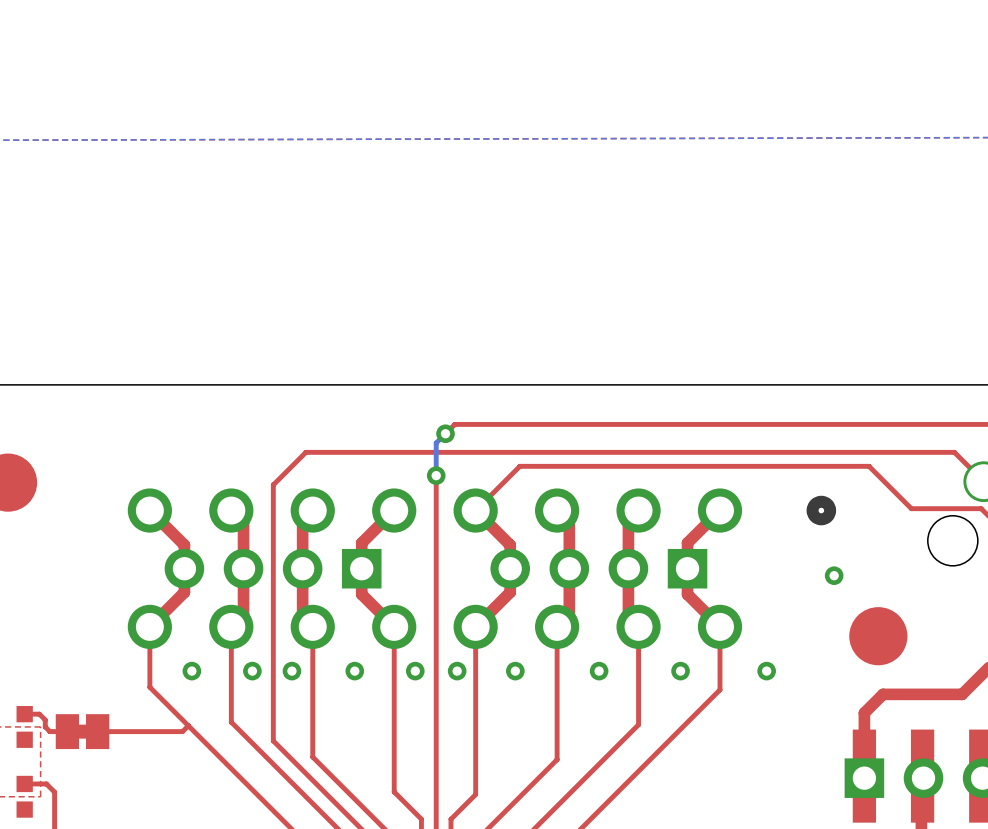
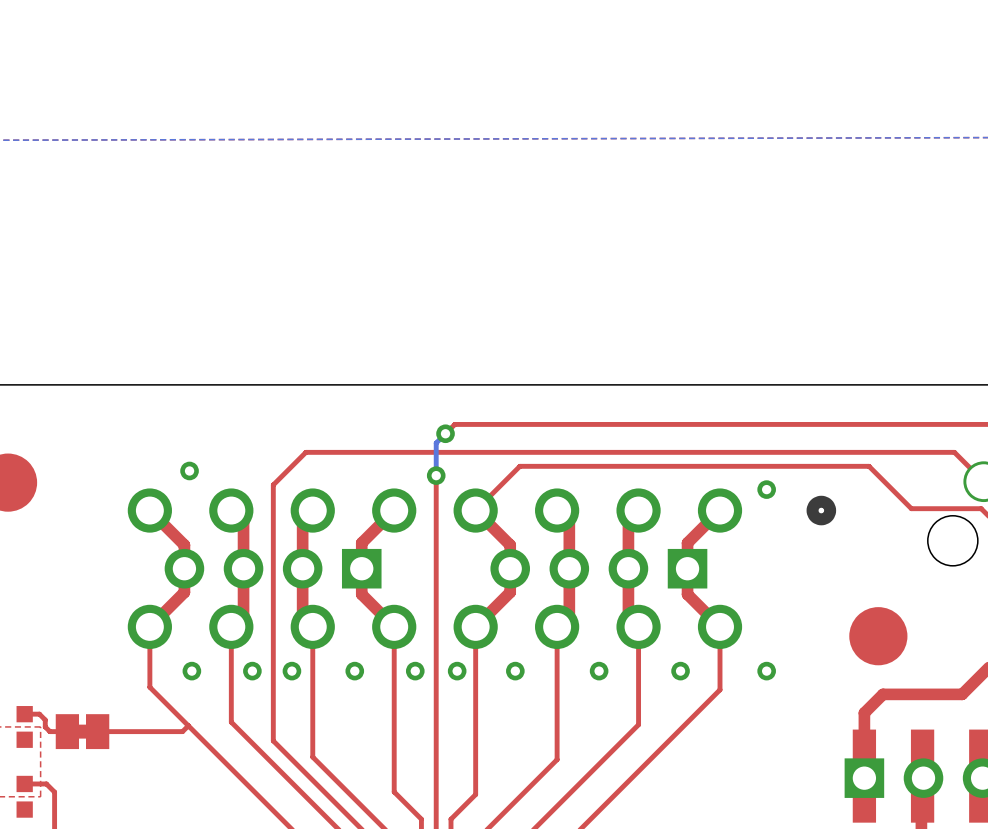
via: none -> (189, 470)
via position: (834, 575) -> (766, 489)

